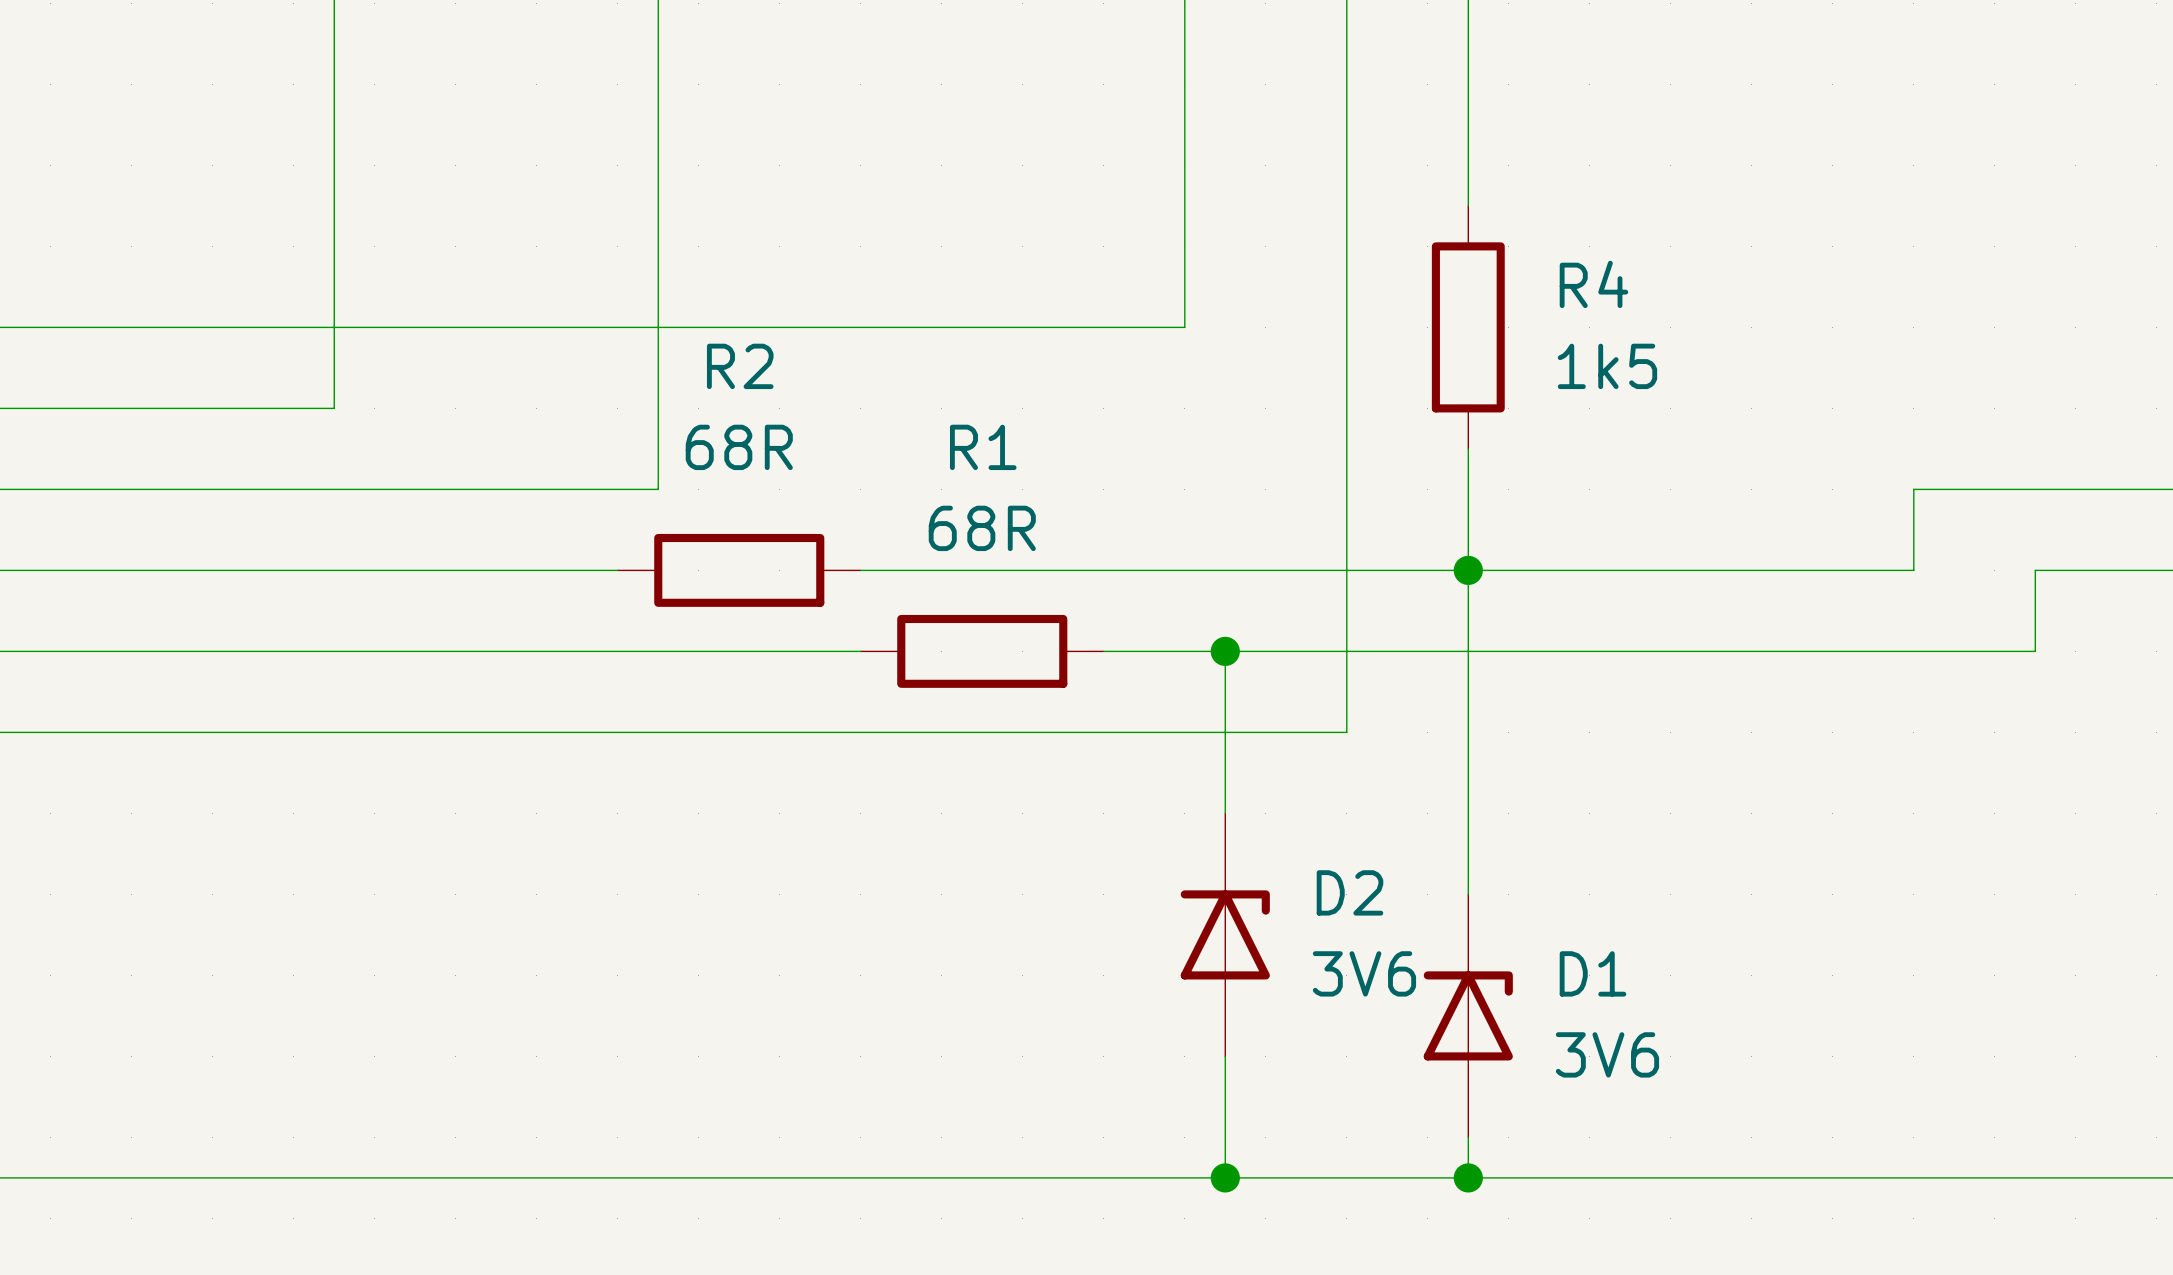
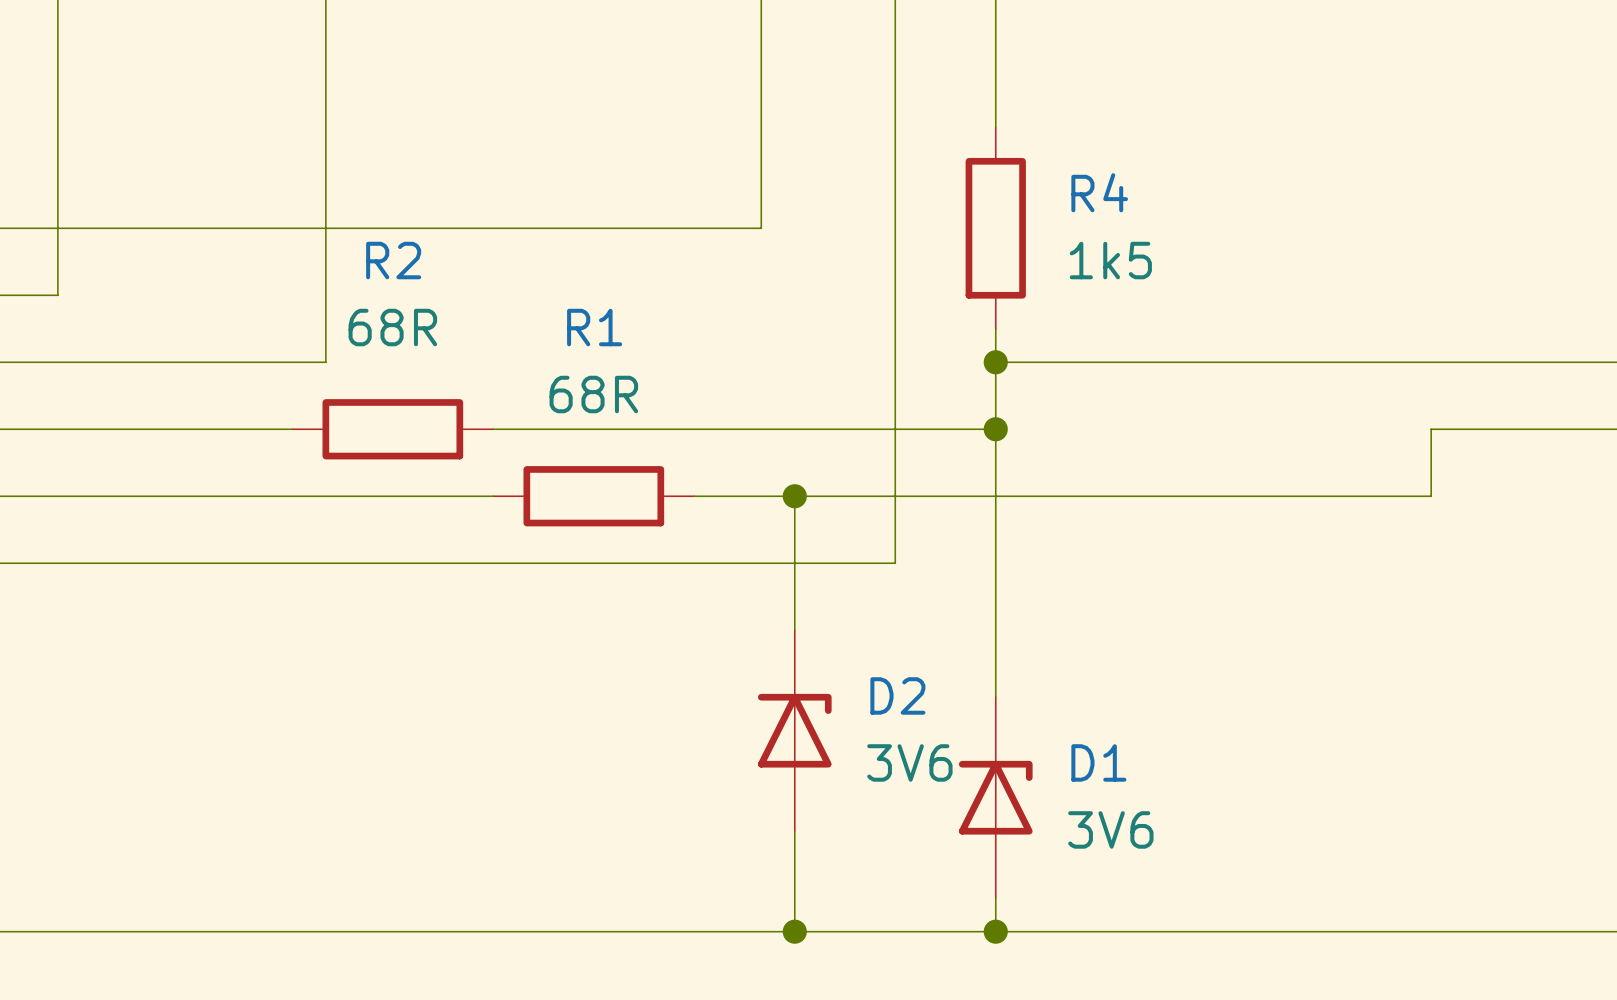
junction: none -> (995, 362)
wire: (1913, 489) (1913, 570) (1468, 570) -> (1364, 362) (995, 362)
wire: (2035, 570) (2035, 651) (1994, 651) -> (1464, 429) (1431, 429) (1431, 496)

